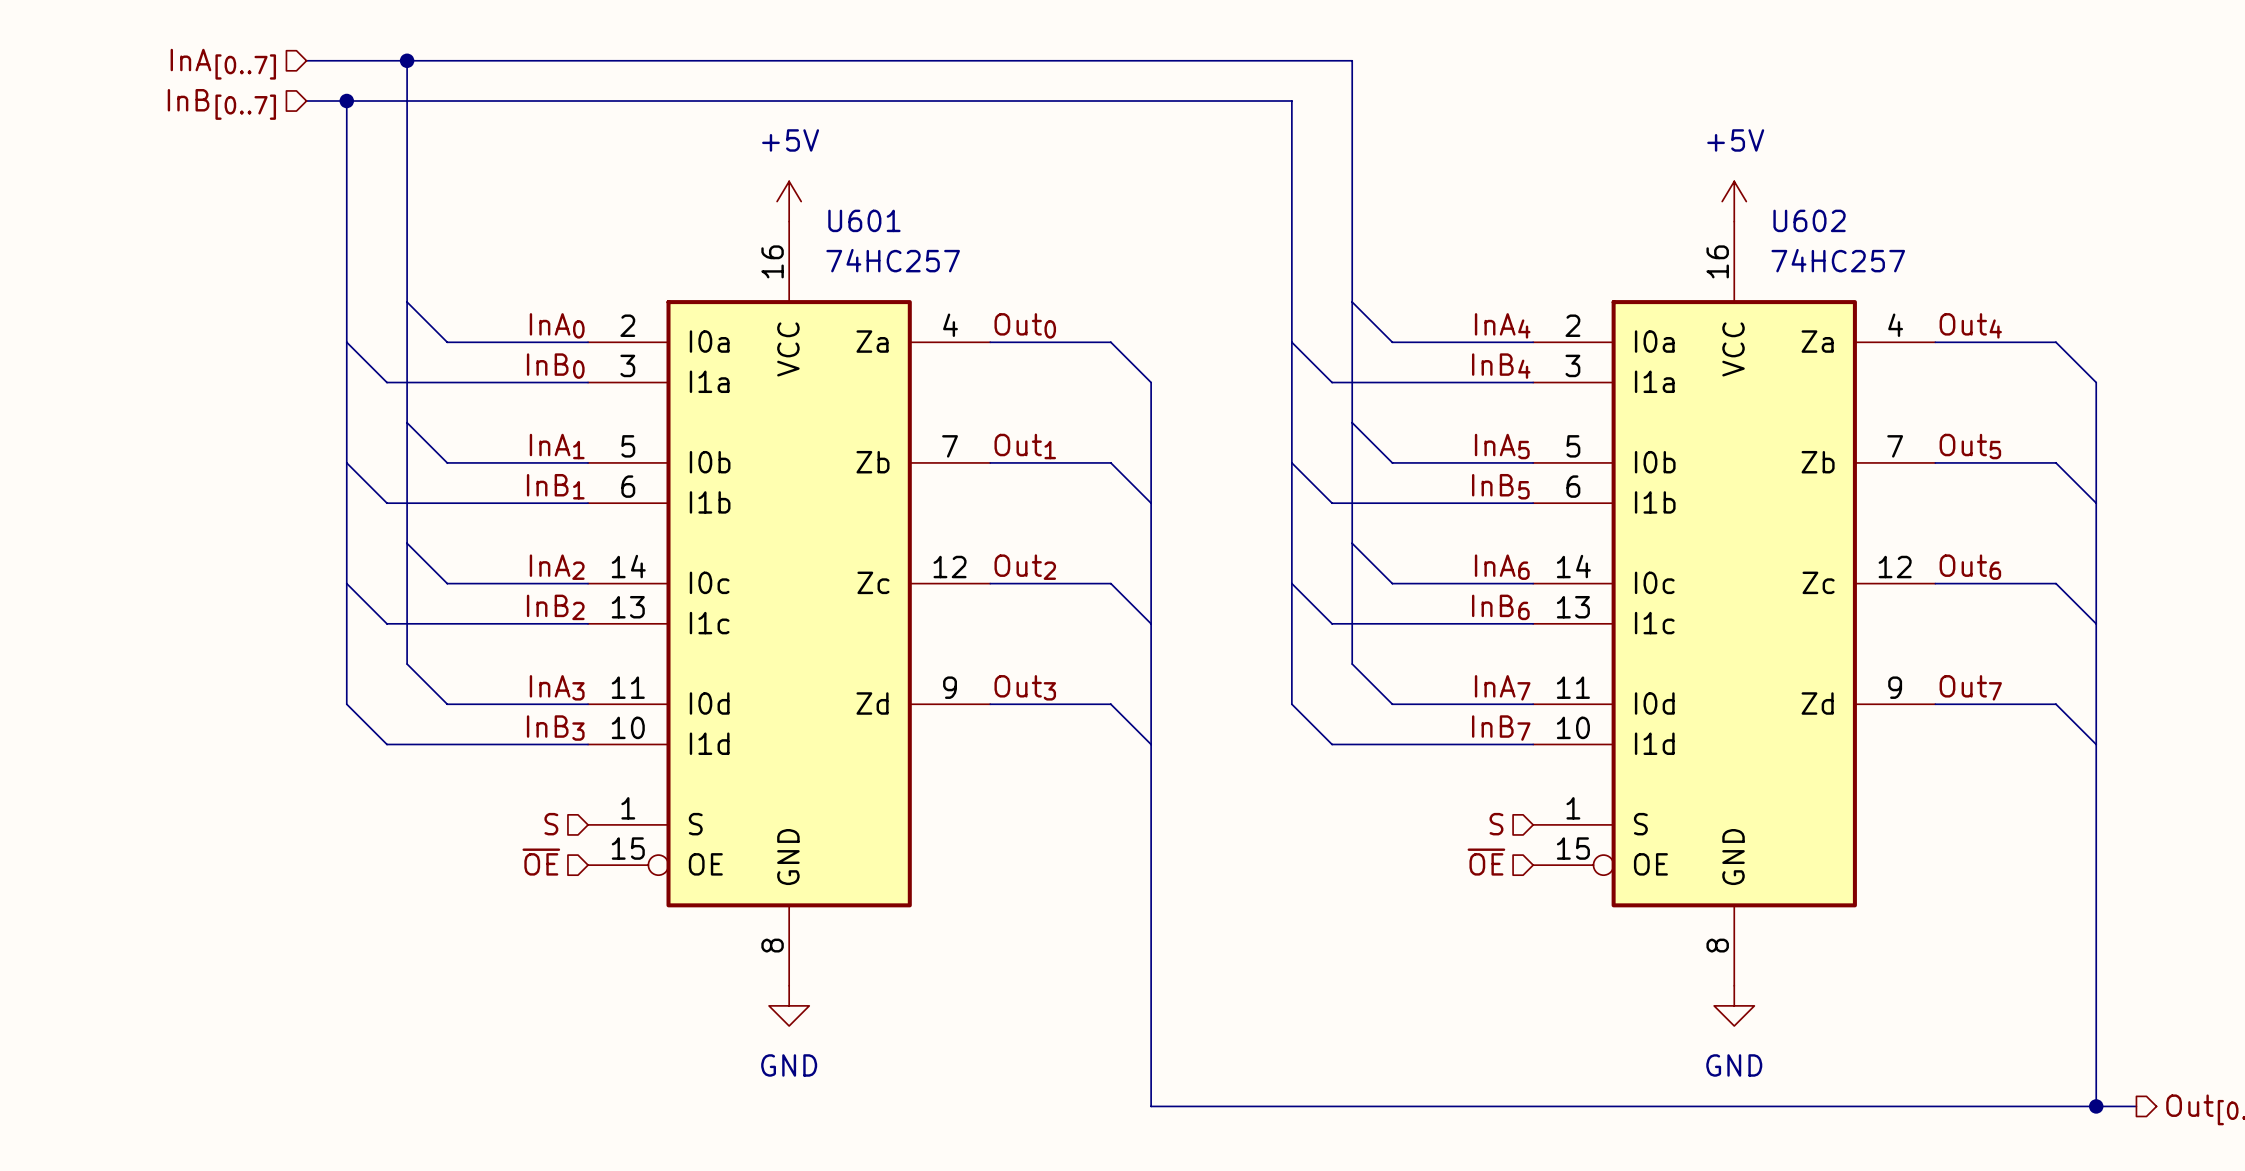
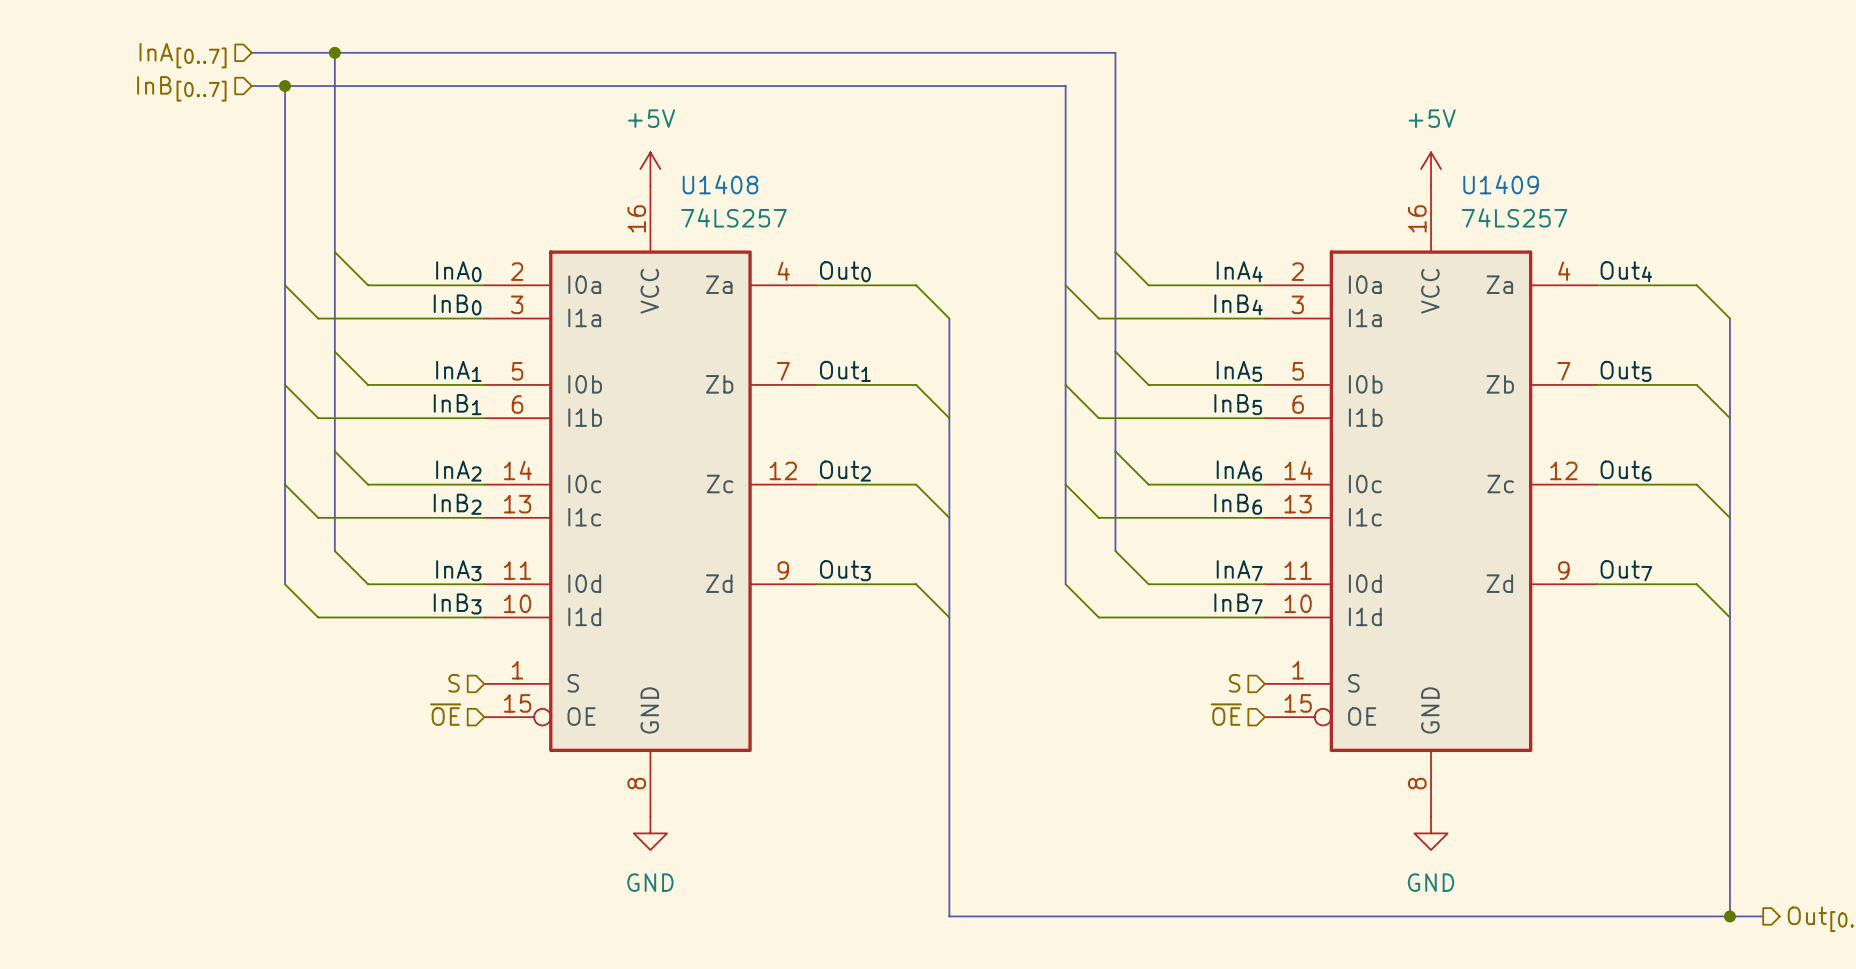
U601 name: U601 (864, 220) -> U1408 (720, 184)
U602 name: U602 (1809, 220) -> U1409 (1501, 184)
U601 value: 74HC257 (893, 260) -> 74LS257 (733, 217)
U602 value: 74HC257 (1838, 260) -> 74LS257 (1514, 217)

